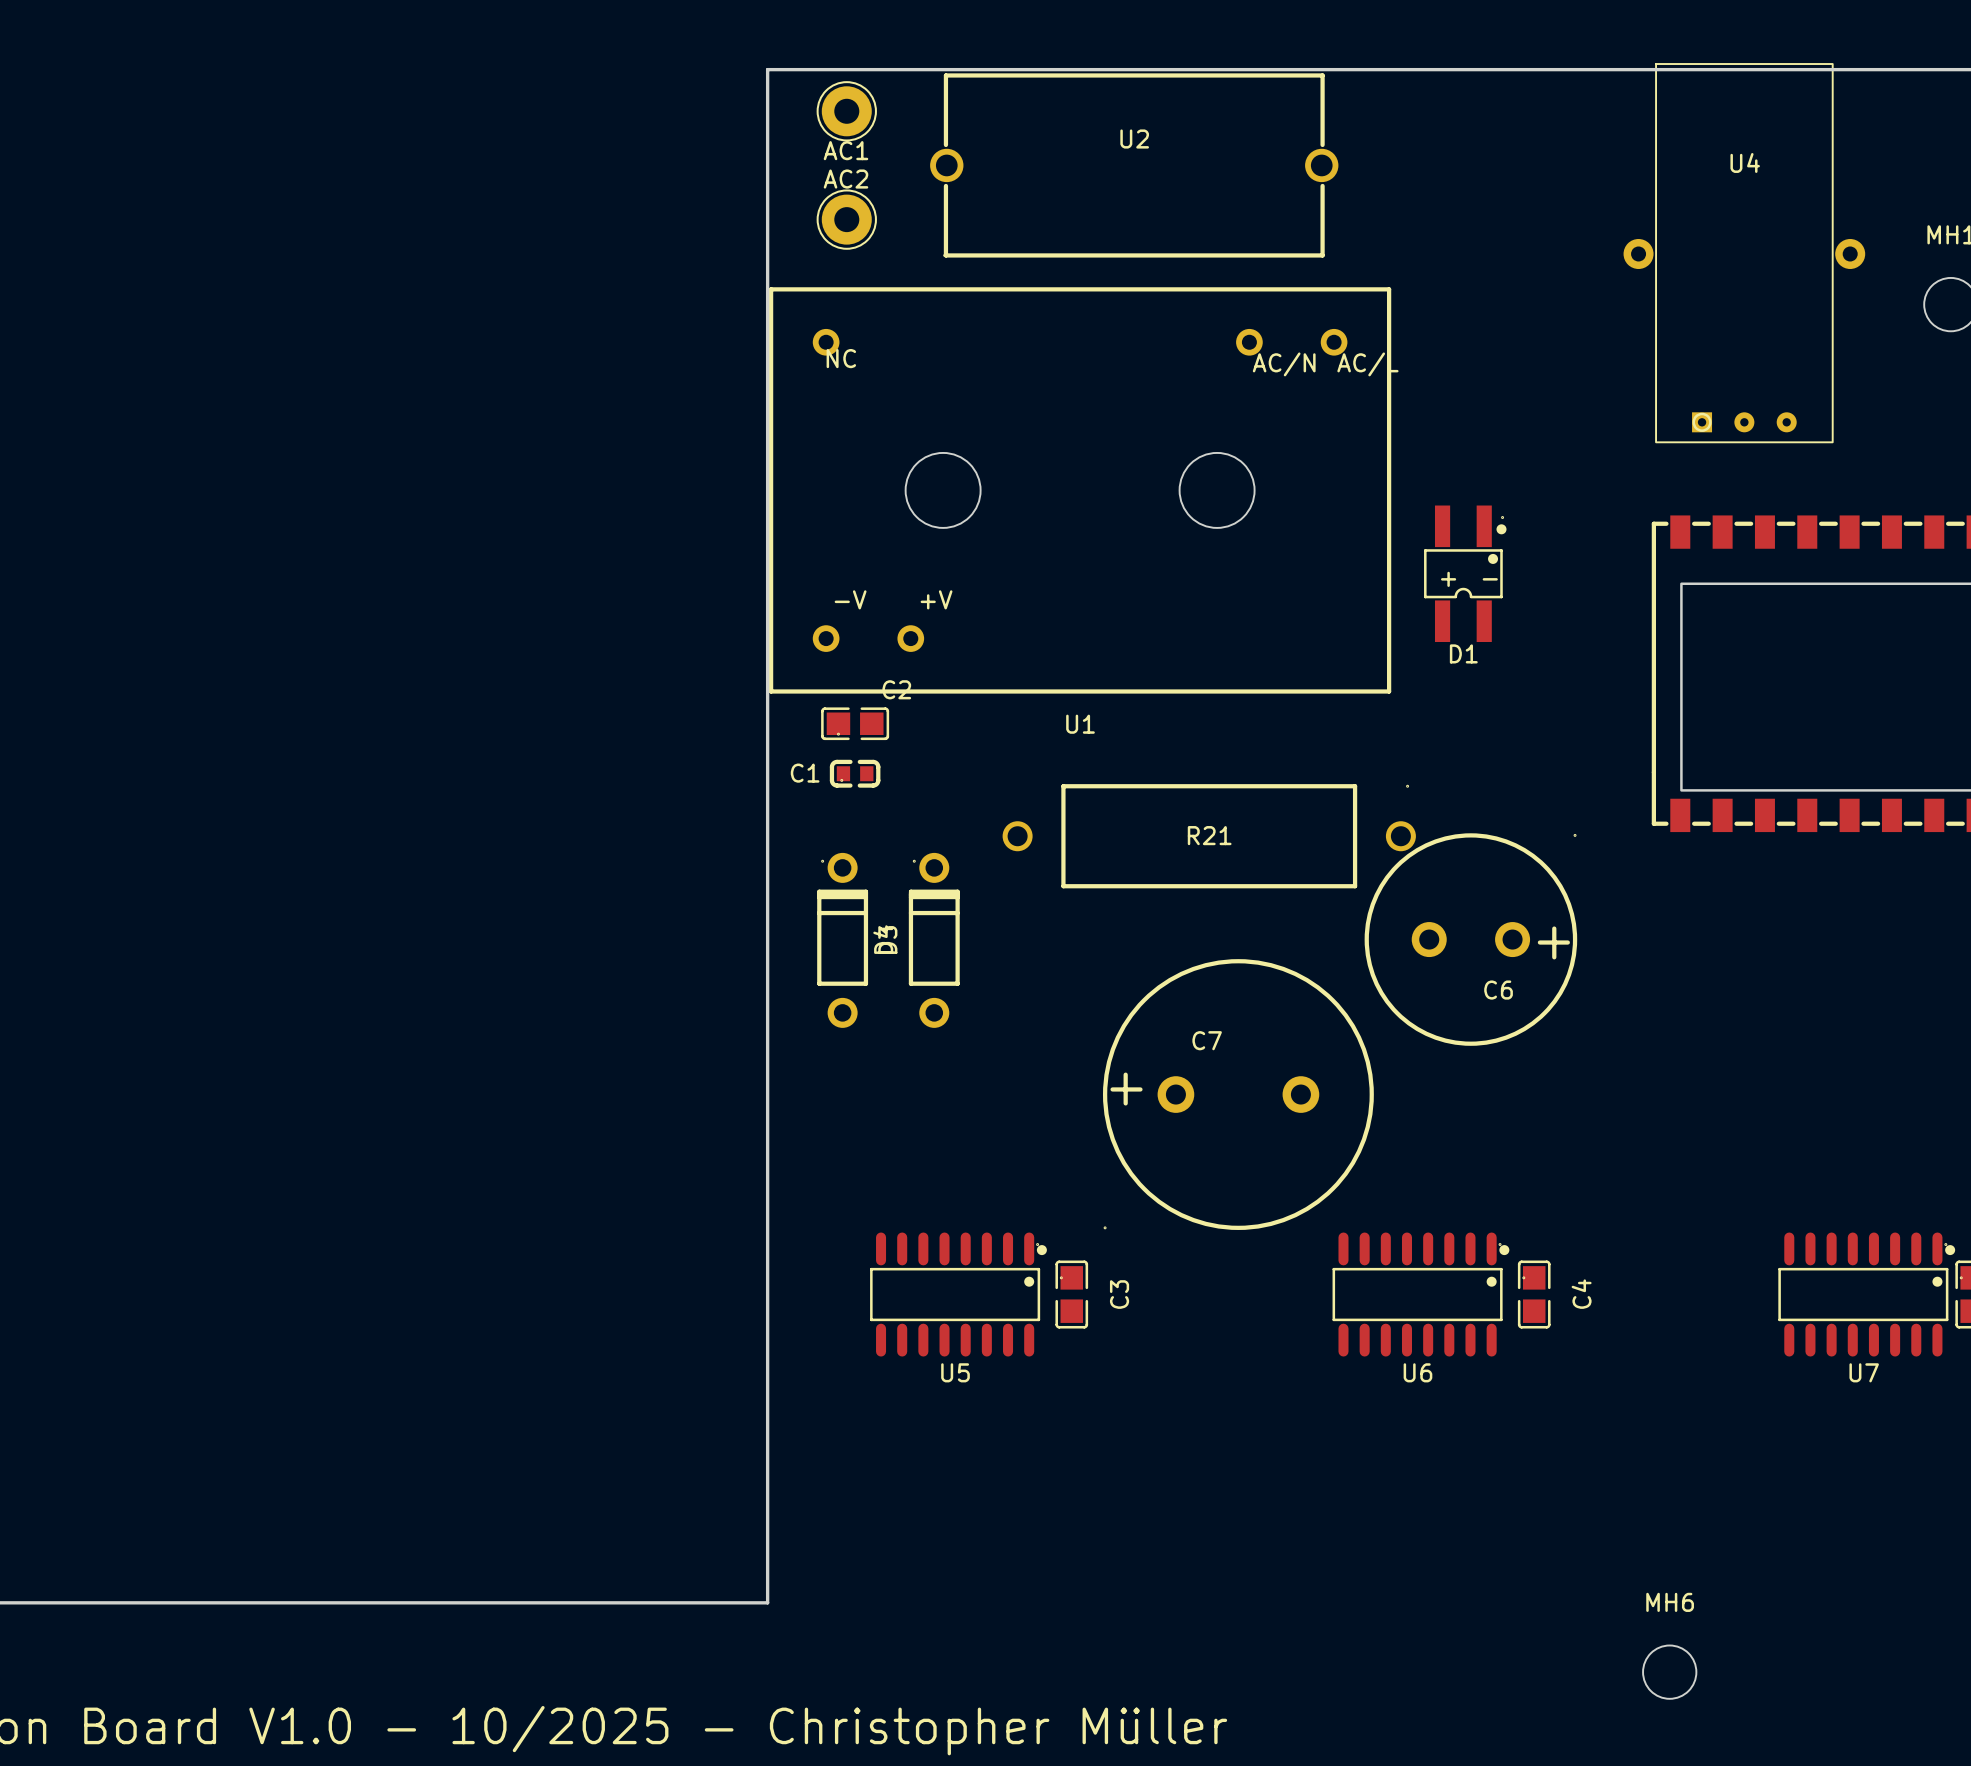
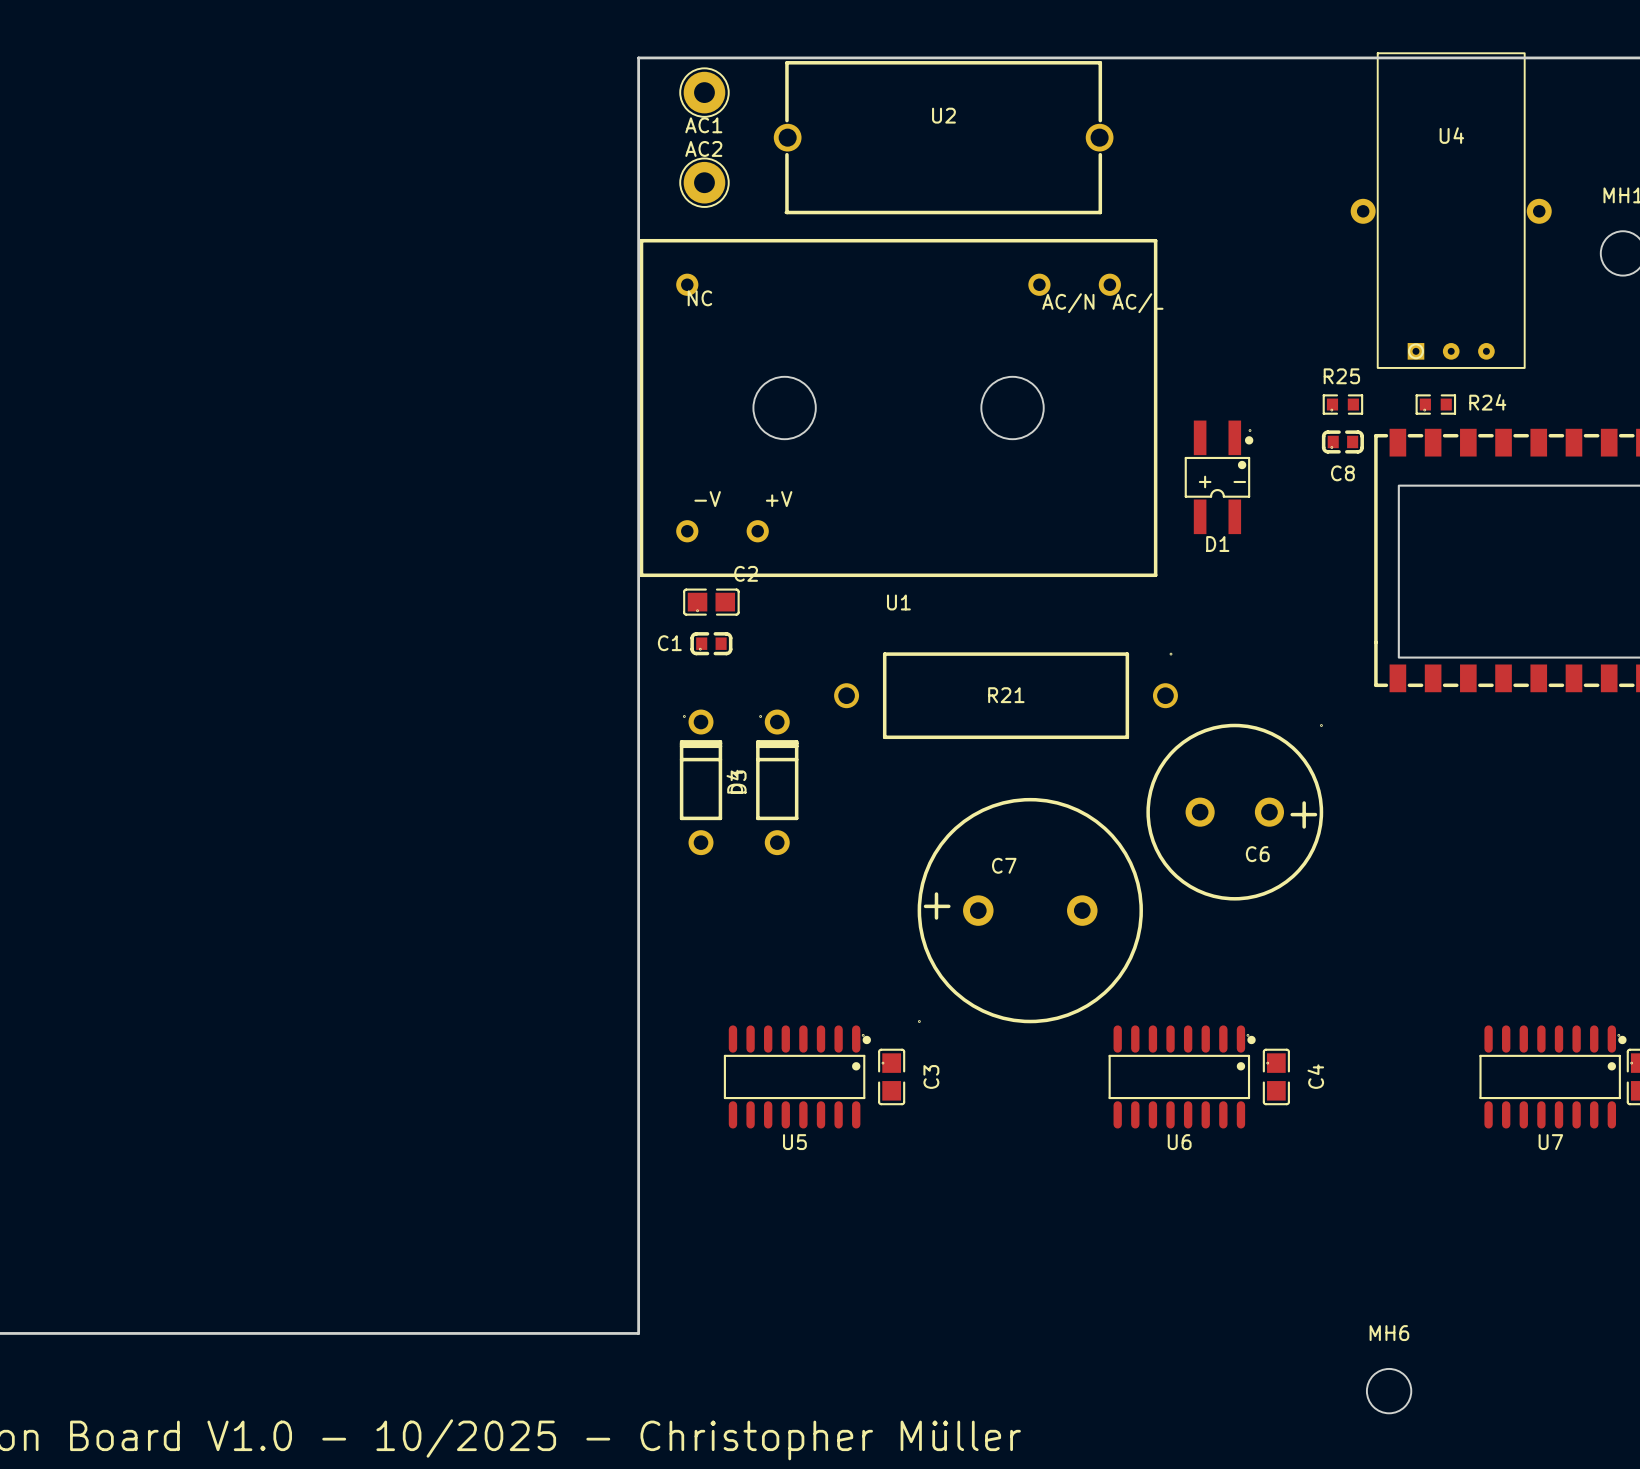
R25: none -> (1342, 404)
R24: none -> (1435, 404)
C8: none -> (1342, 441)
C6 position: (1470, 939) -> (1234, 812)

